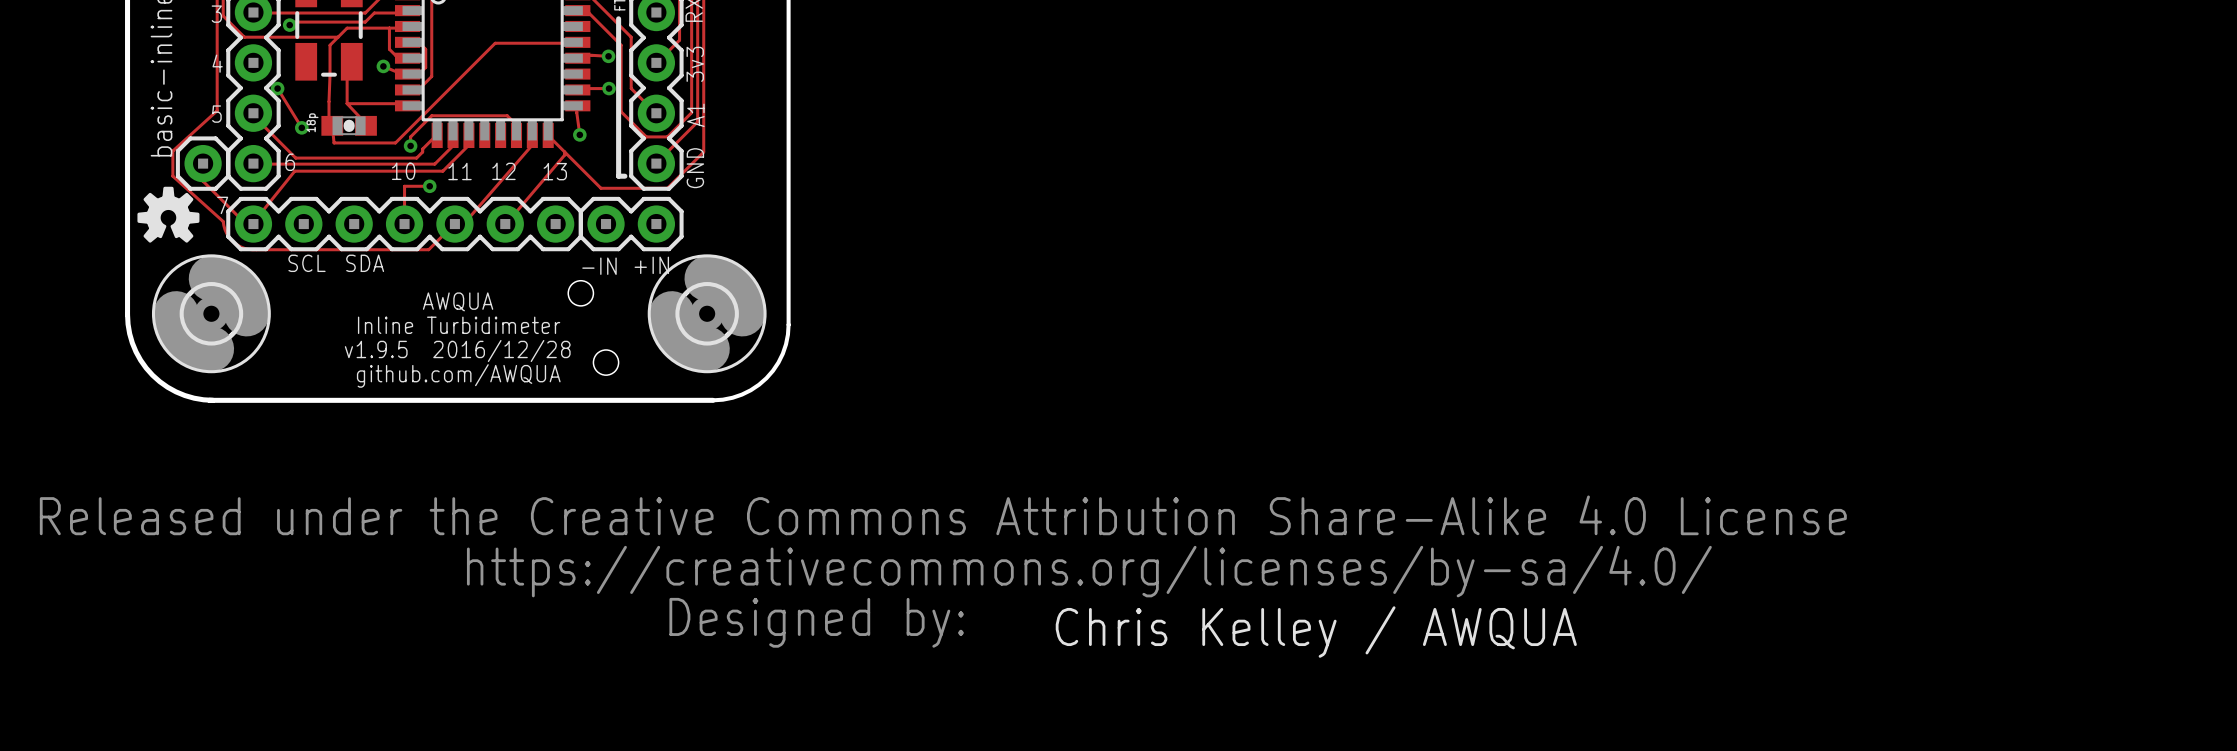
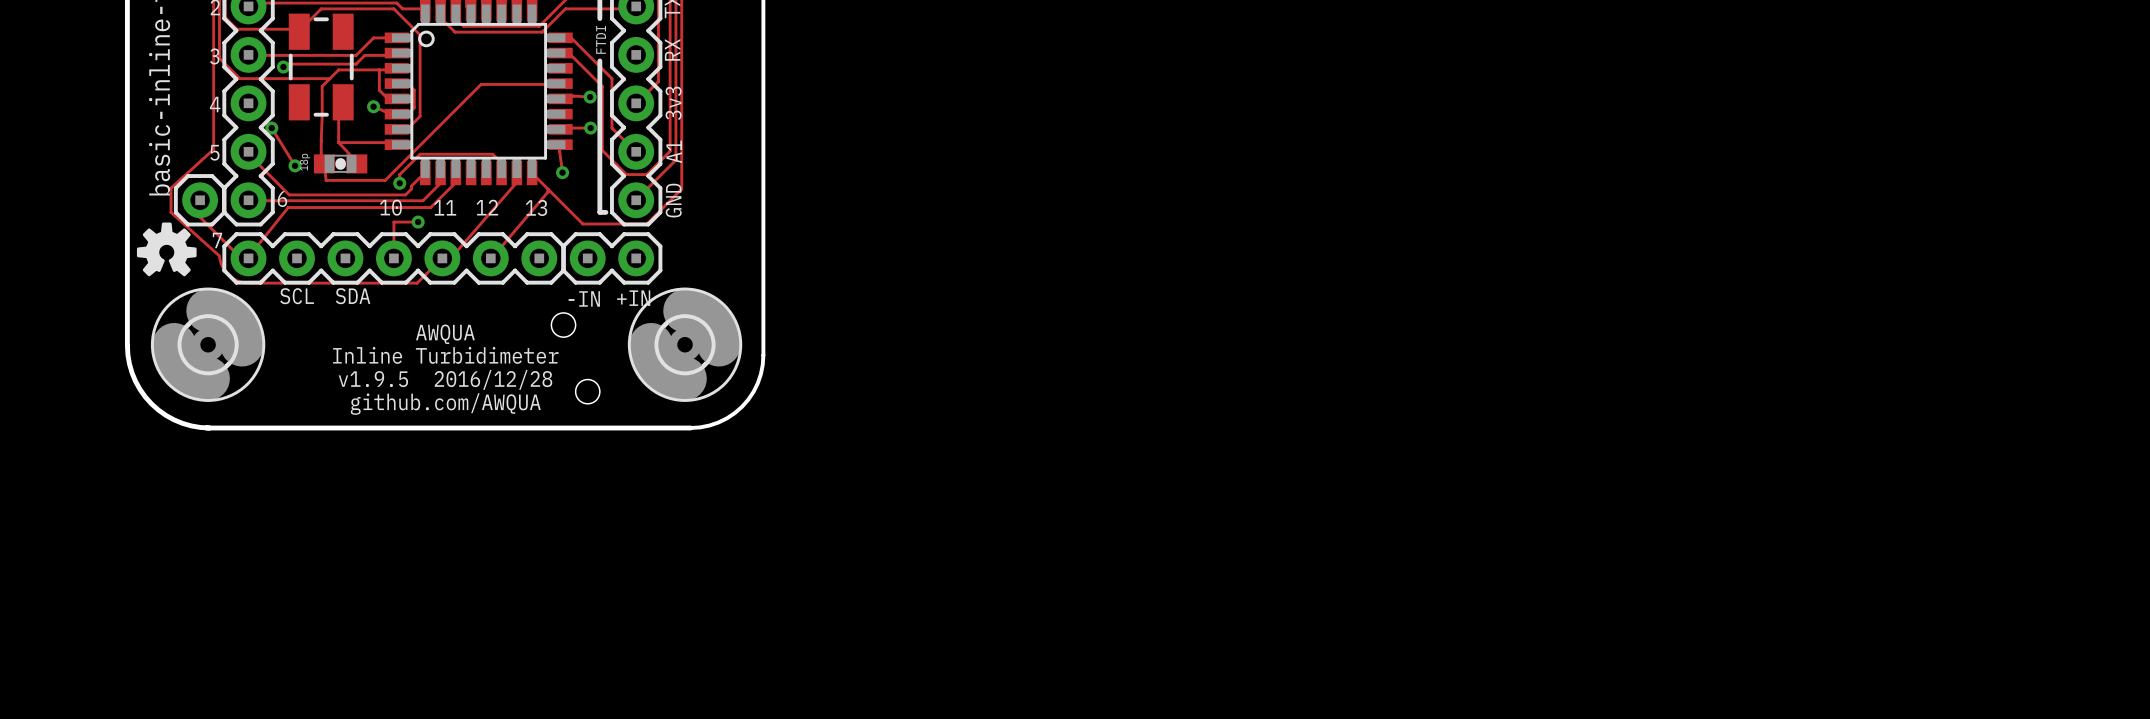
drawing: [39, 495, 1847, 648] -> none
text: Chris Kelley / AWQUA (1316, 632) -> none

